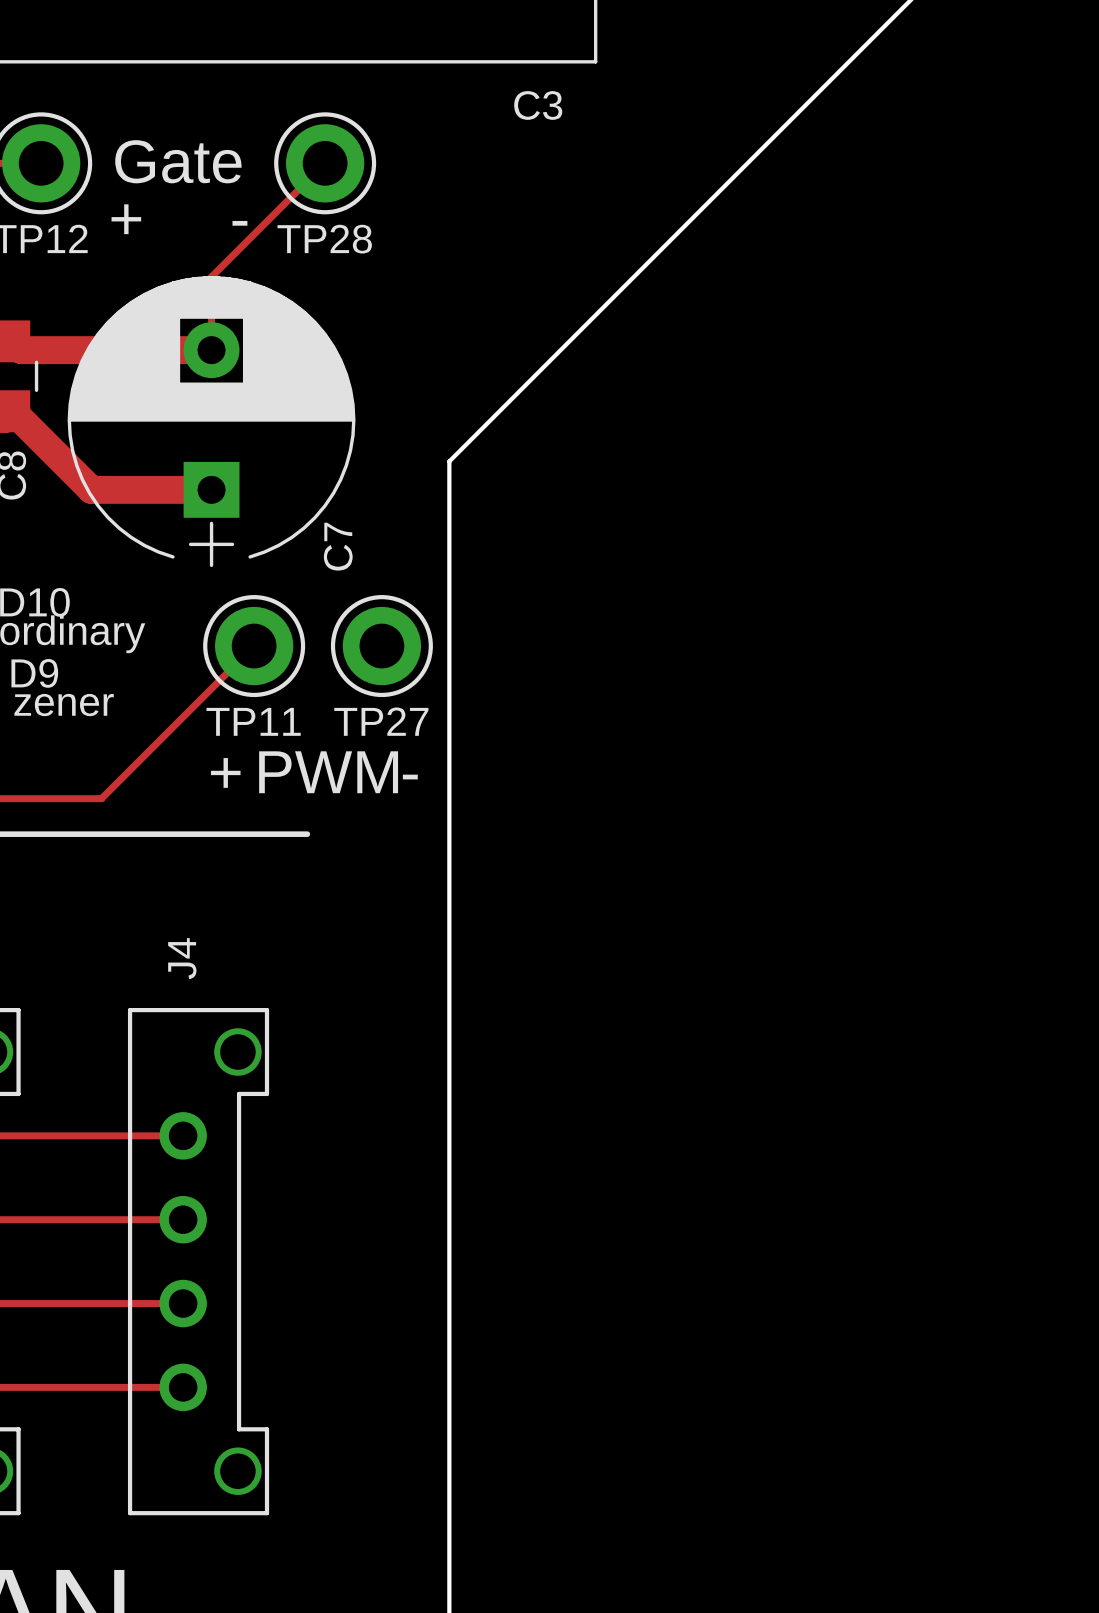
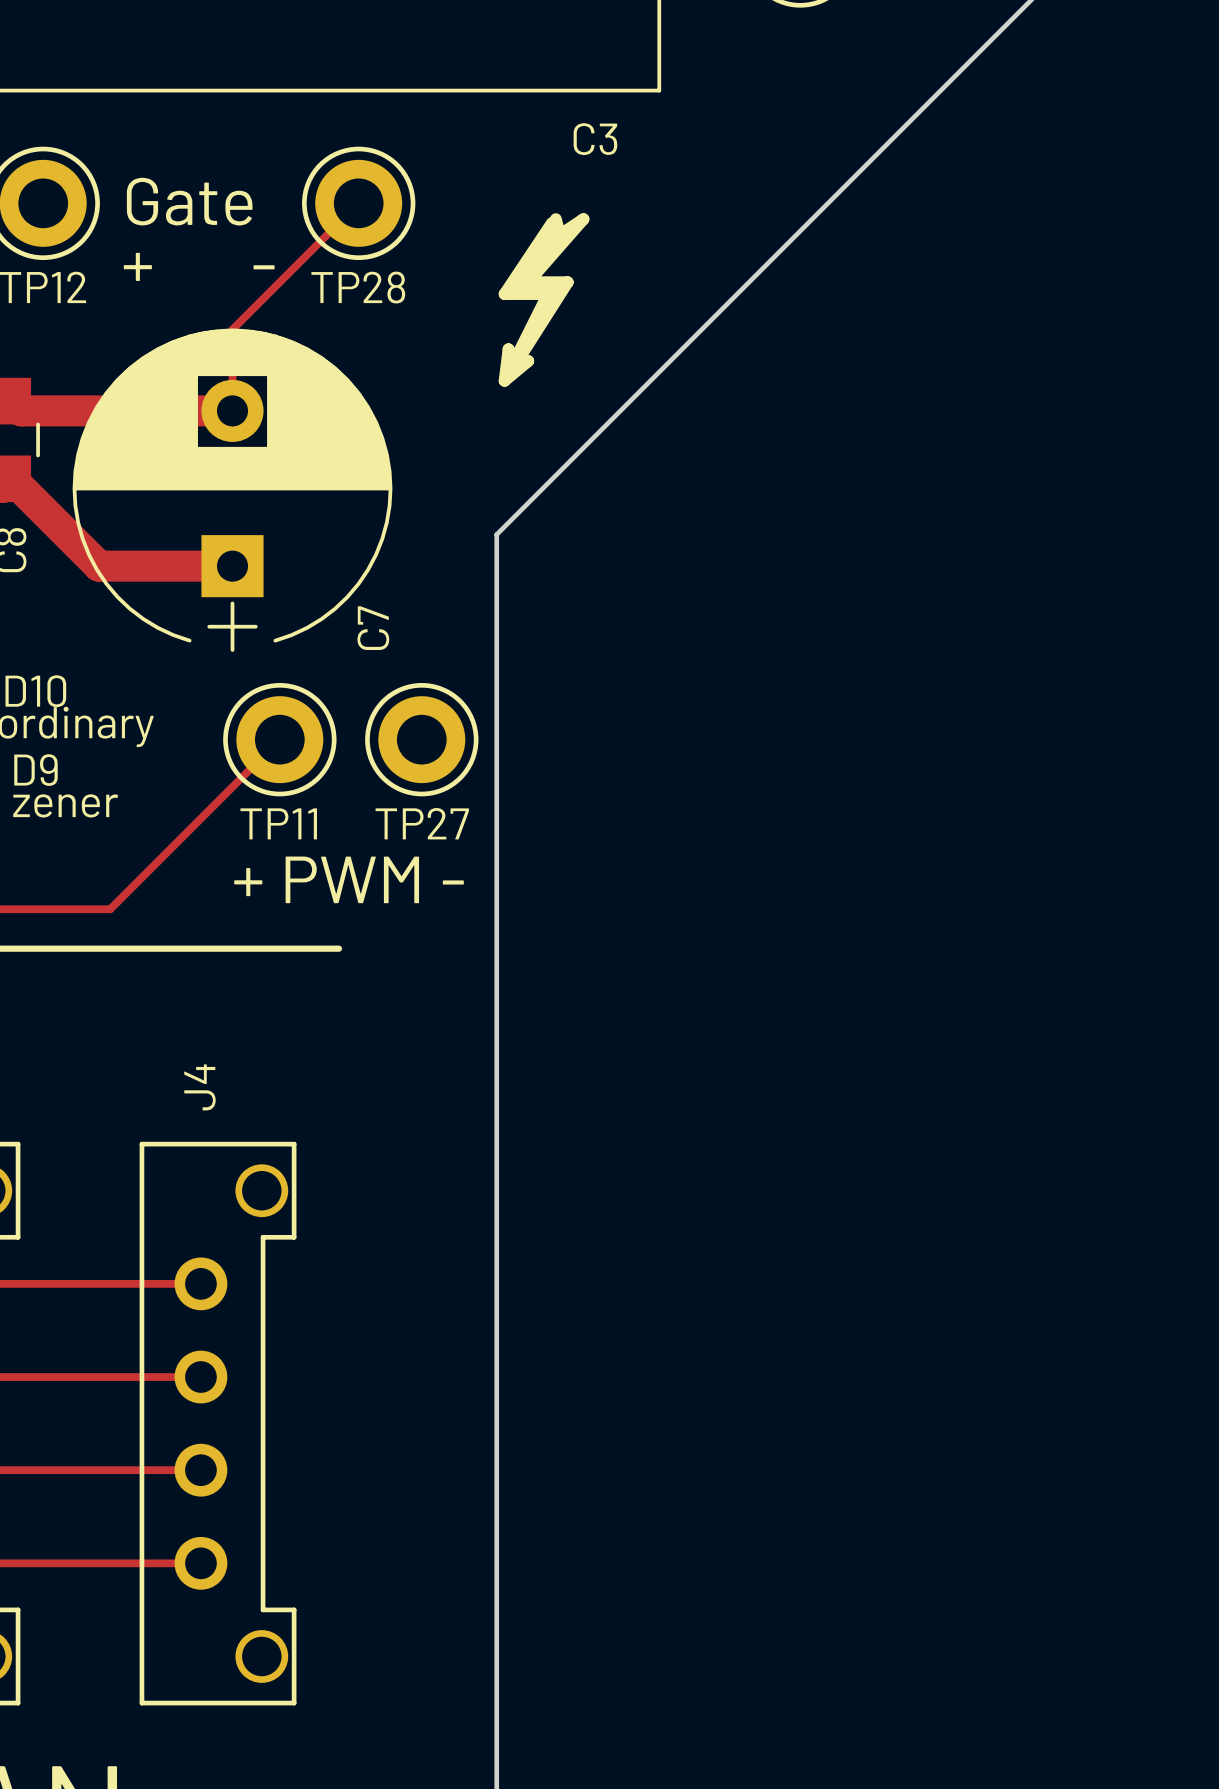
drawing: none -> [498, 213, 590, 387]

